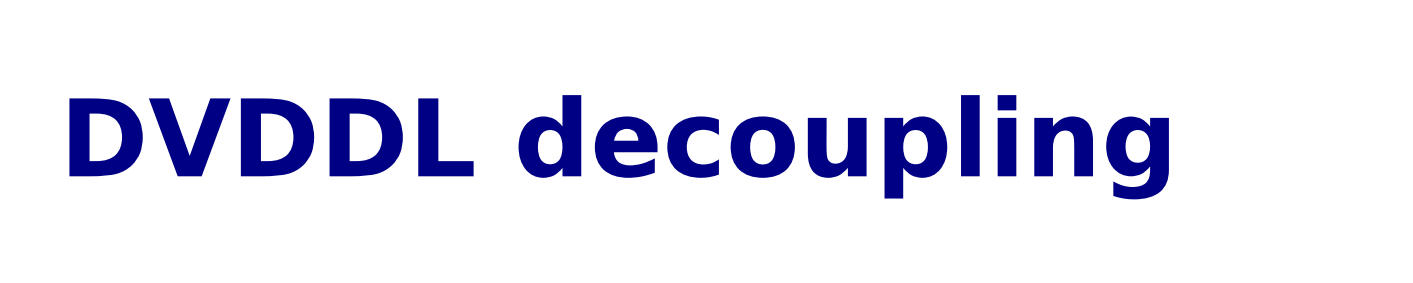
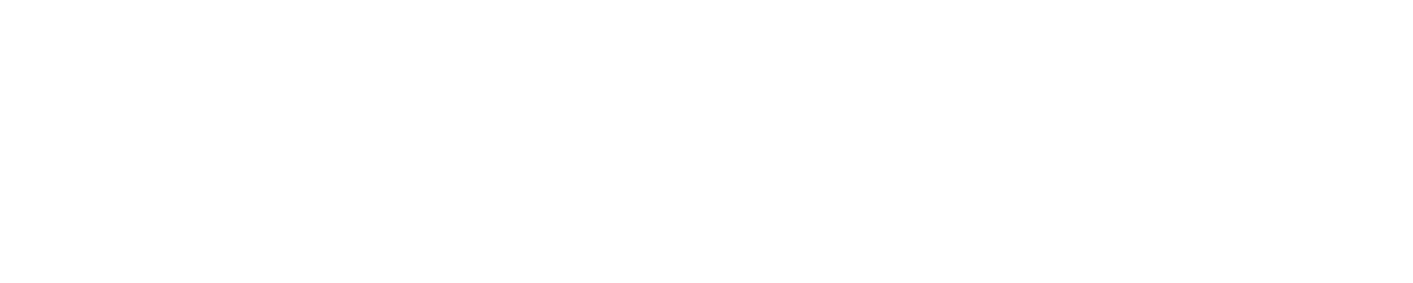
text: DVDDL decoupling (619, 147) -> none

